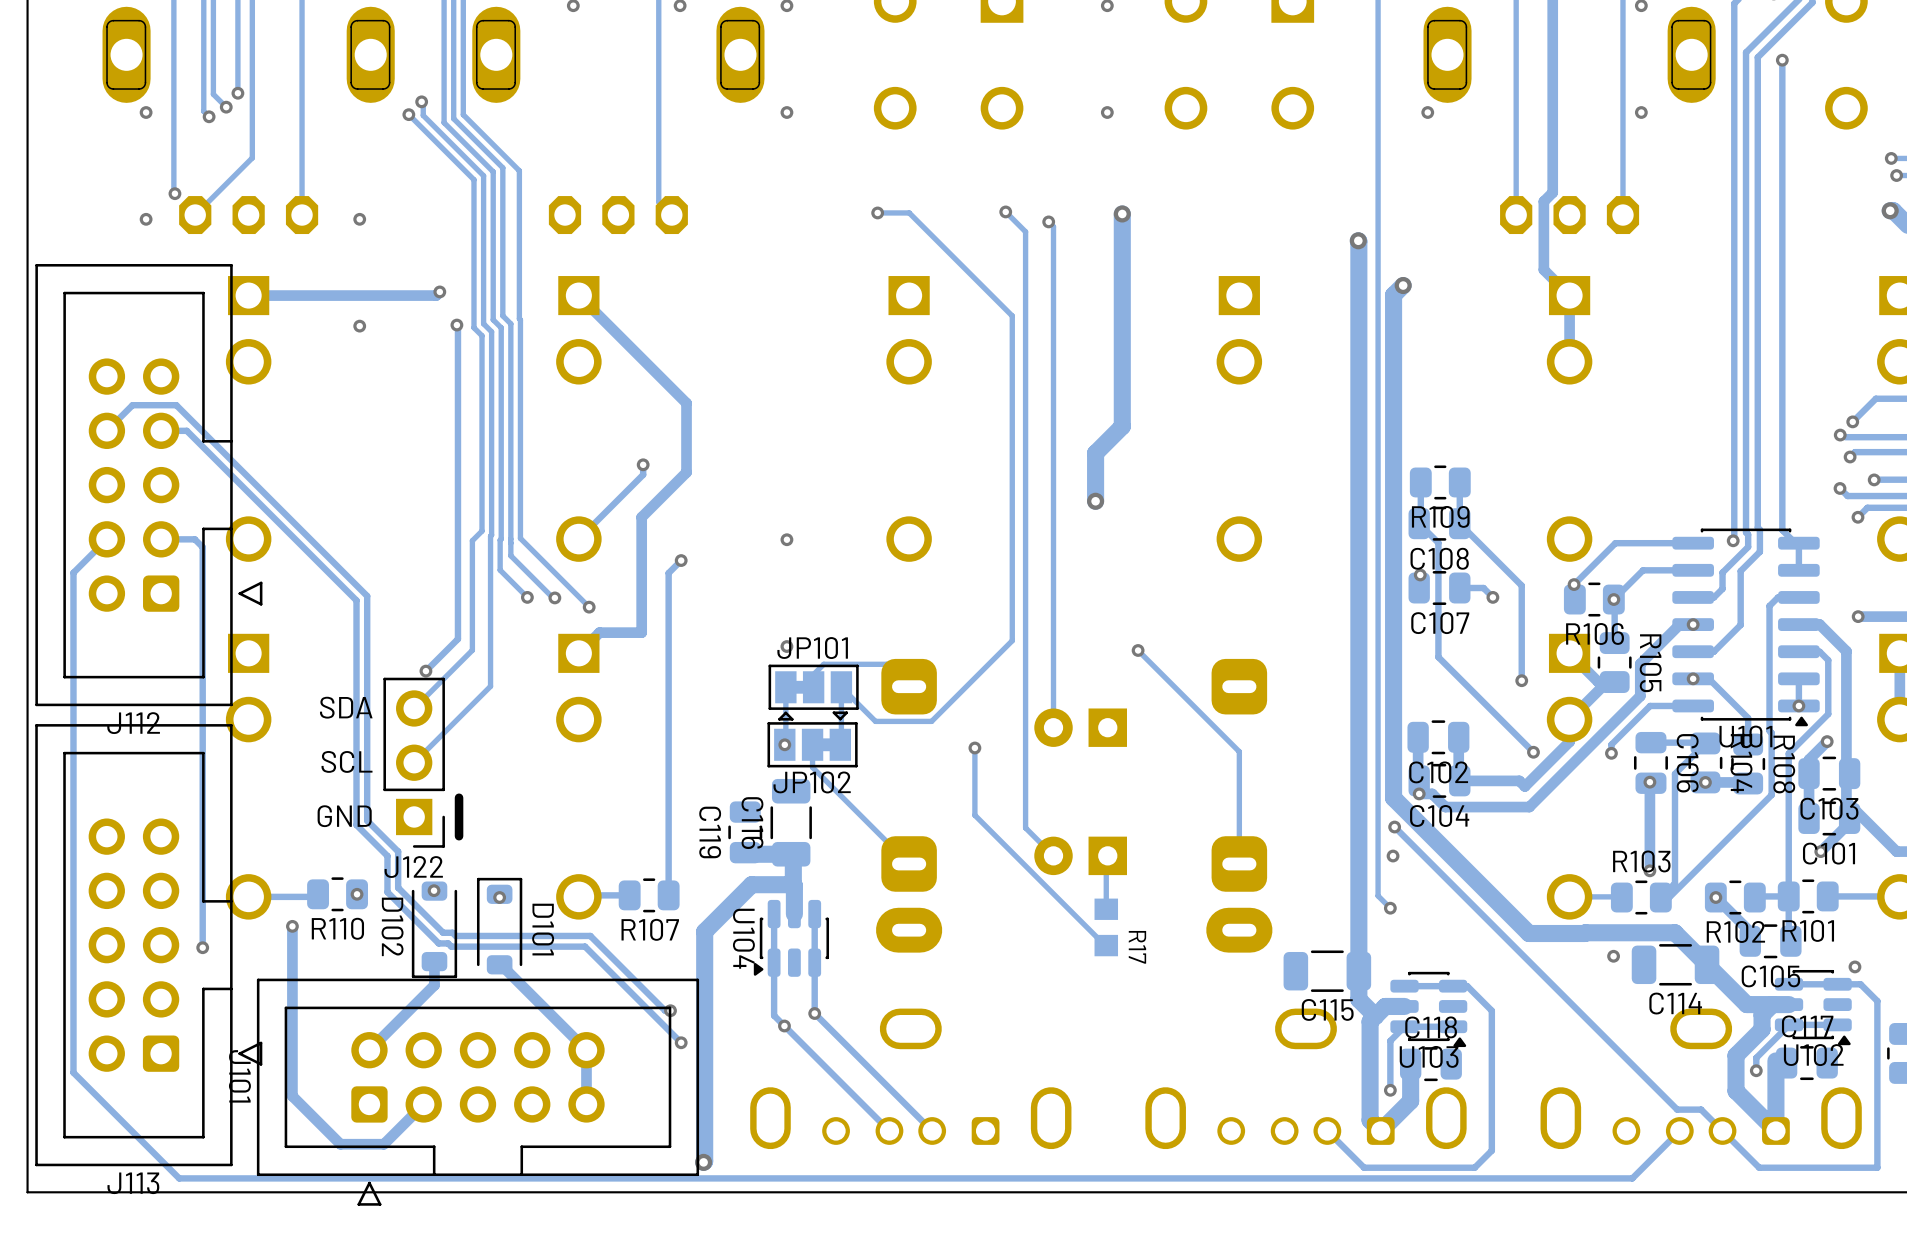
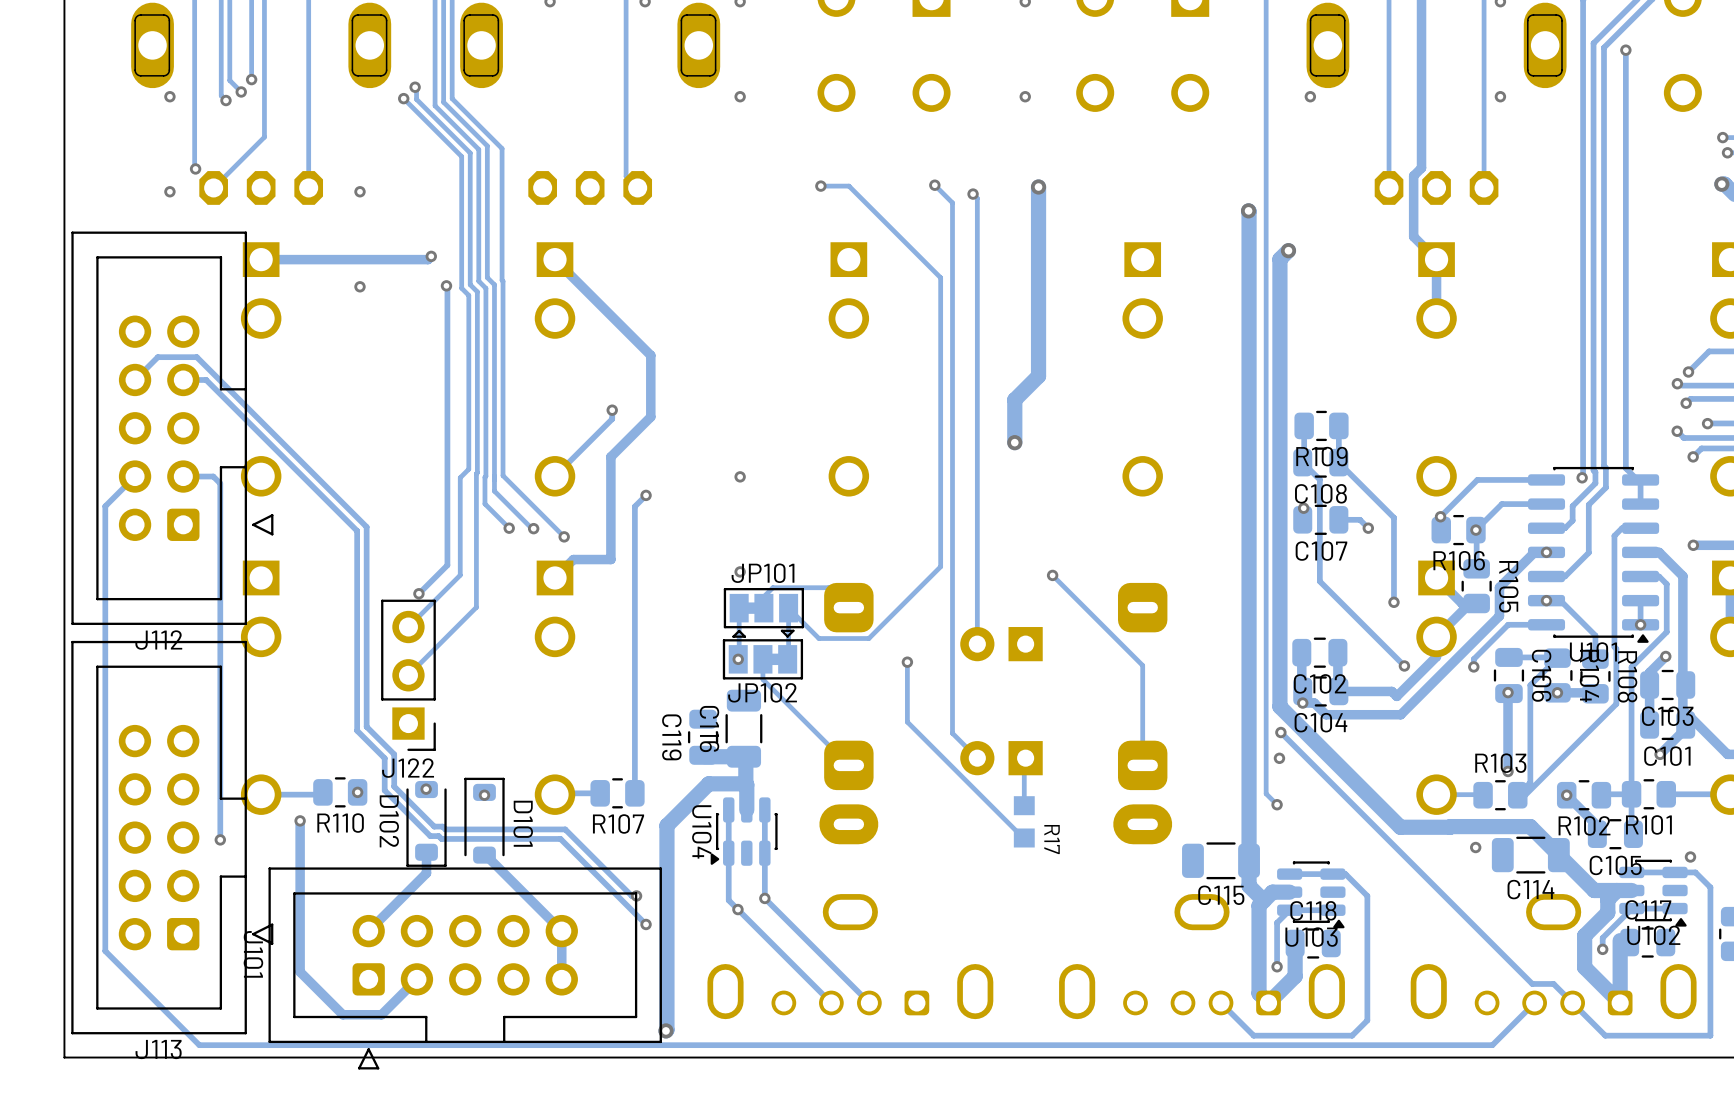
text: SDA (346, 707) -> none
text: SCL (347, 761) -> none
line: (459, 797) (459, 836) -> none
text: GND (344, 816) -> none

